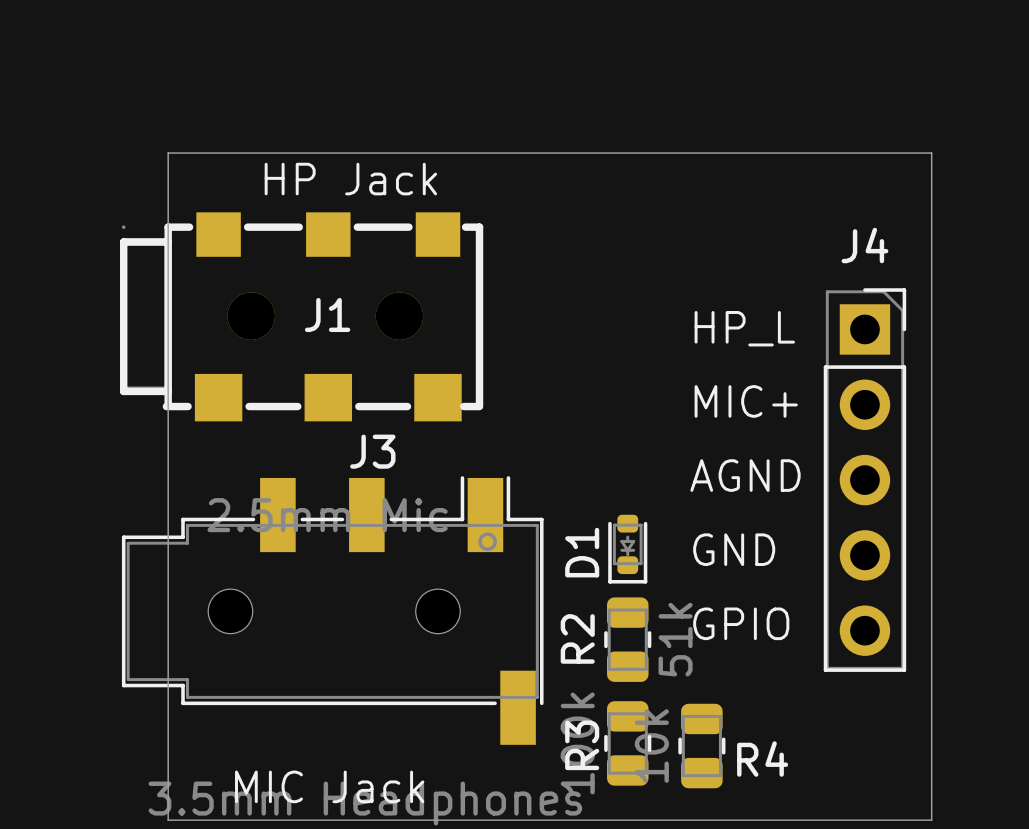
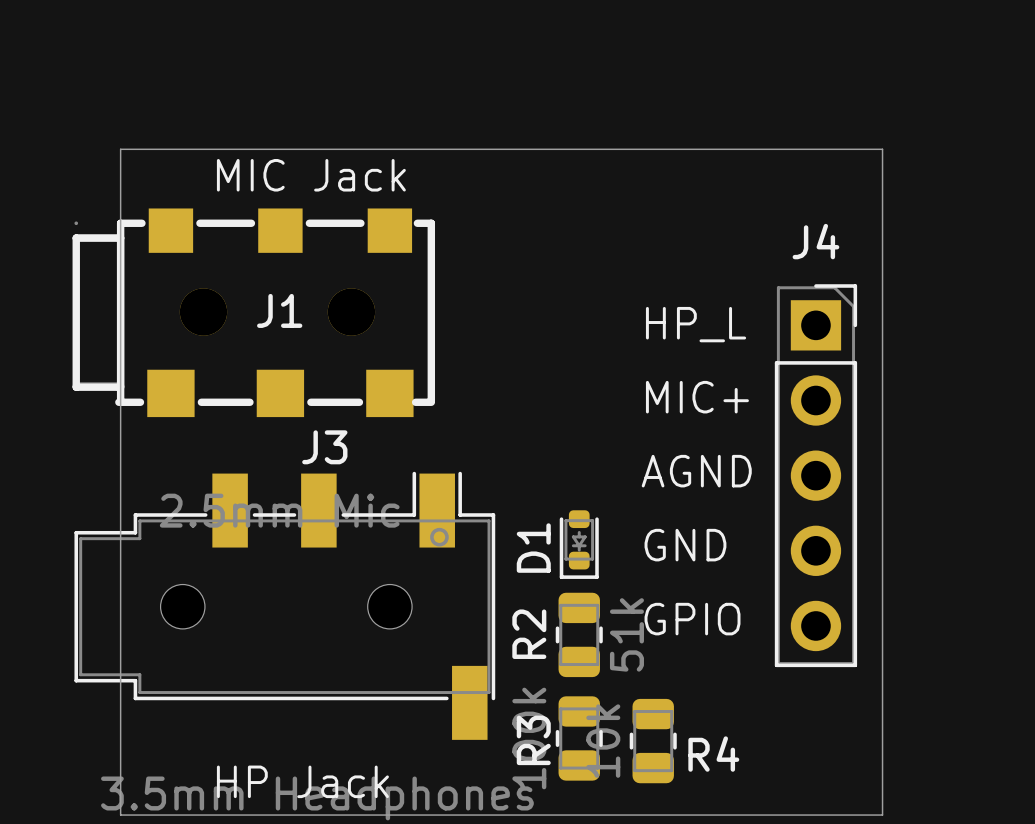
text: HP Jack (350, 179) -> MIC Jack (311, 175)
text: MIC Jack (329, 786) -> HP Jack (302, 781)

